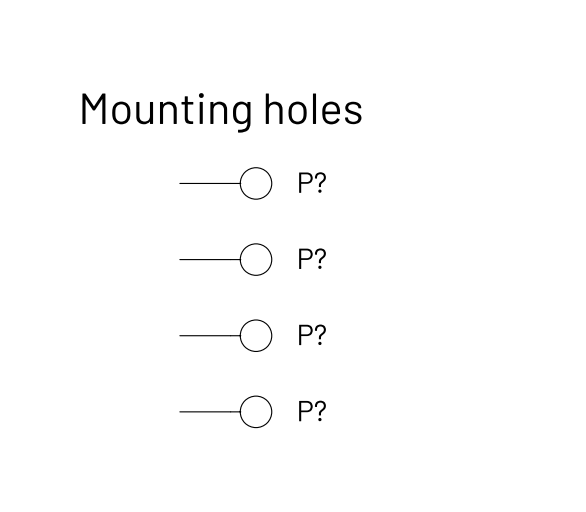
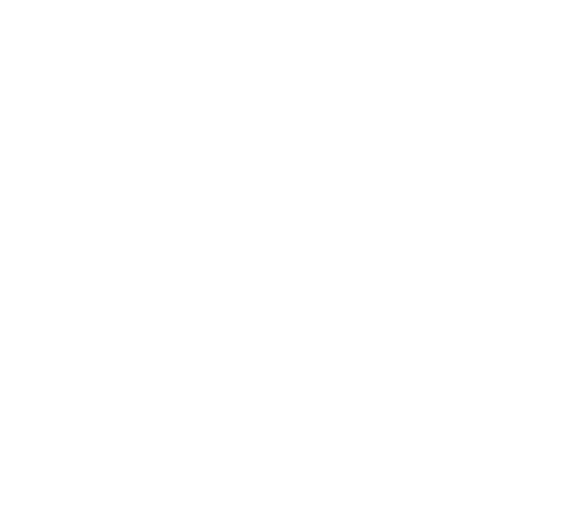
text: Mounting holes (221, 112) -> none
P?: (225, 183) -> none
P?: (225, 259) -> none
P?: (225, 335) -> none
P?: (225, 411) -> none

